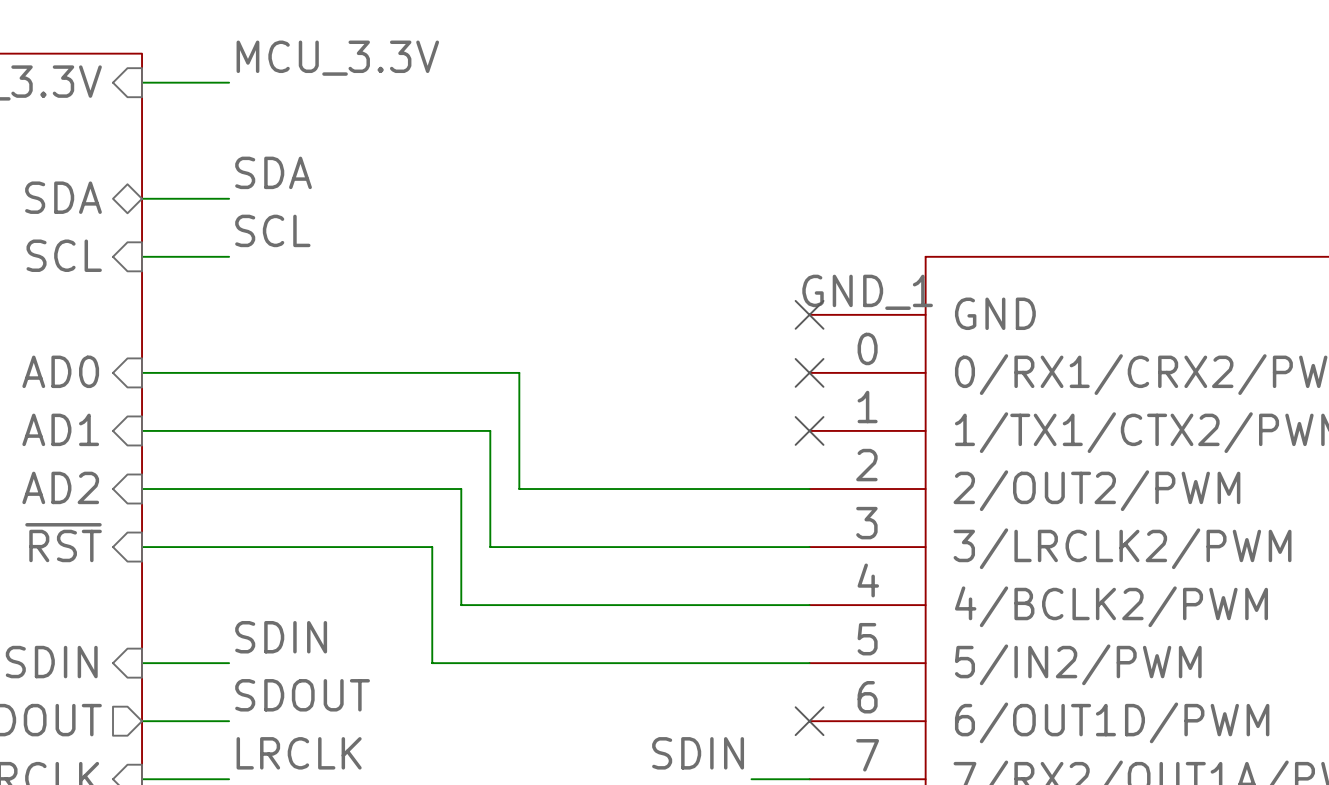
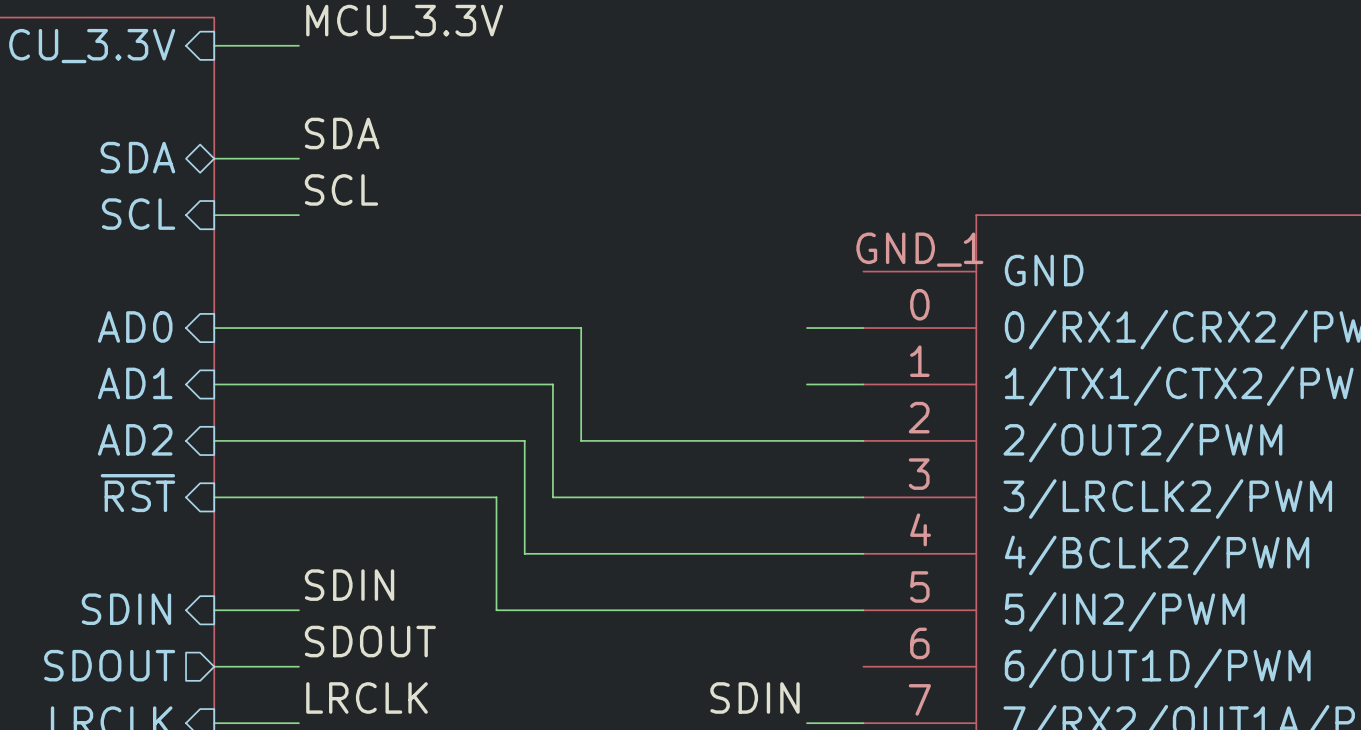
no-connect mark: (809, 314) -> none
wire: none -> (806, 328) (863, 328)
no-connect mark: (809, 372) -> none
wire: none -> (806, 384) (863, 384)
no-connect mark: (809, 430) -> none
no-connect mark: (809, 721) -> none

